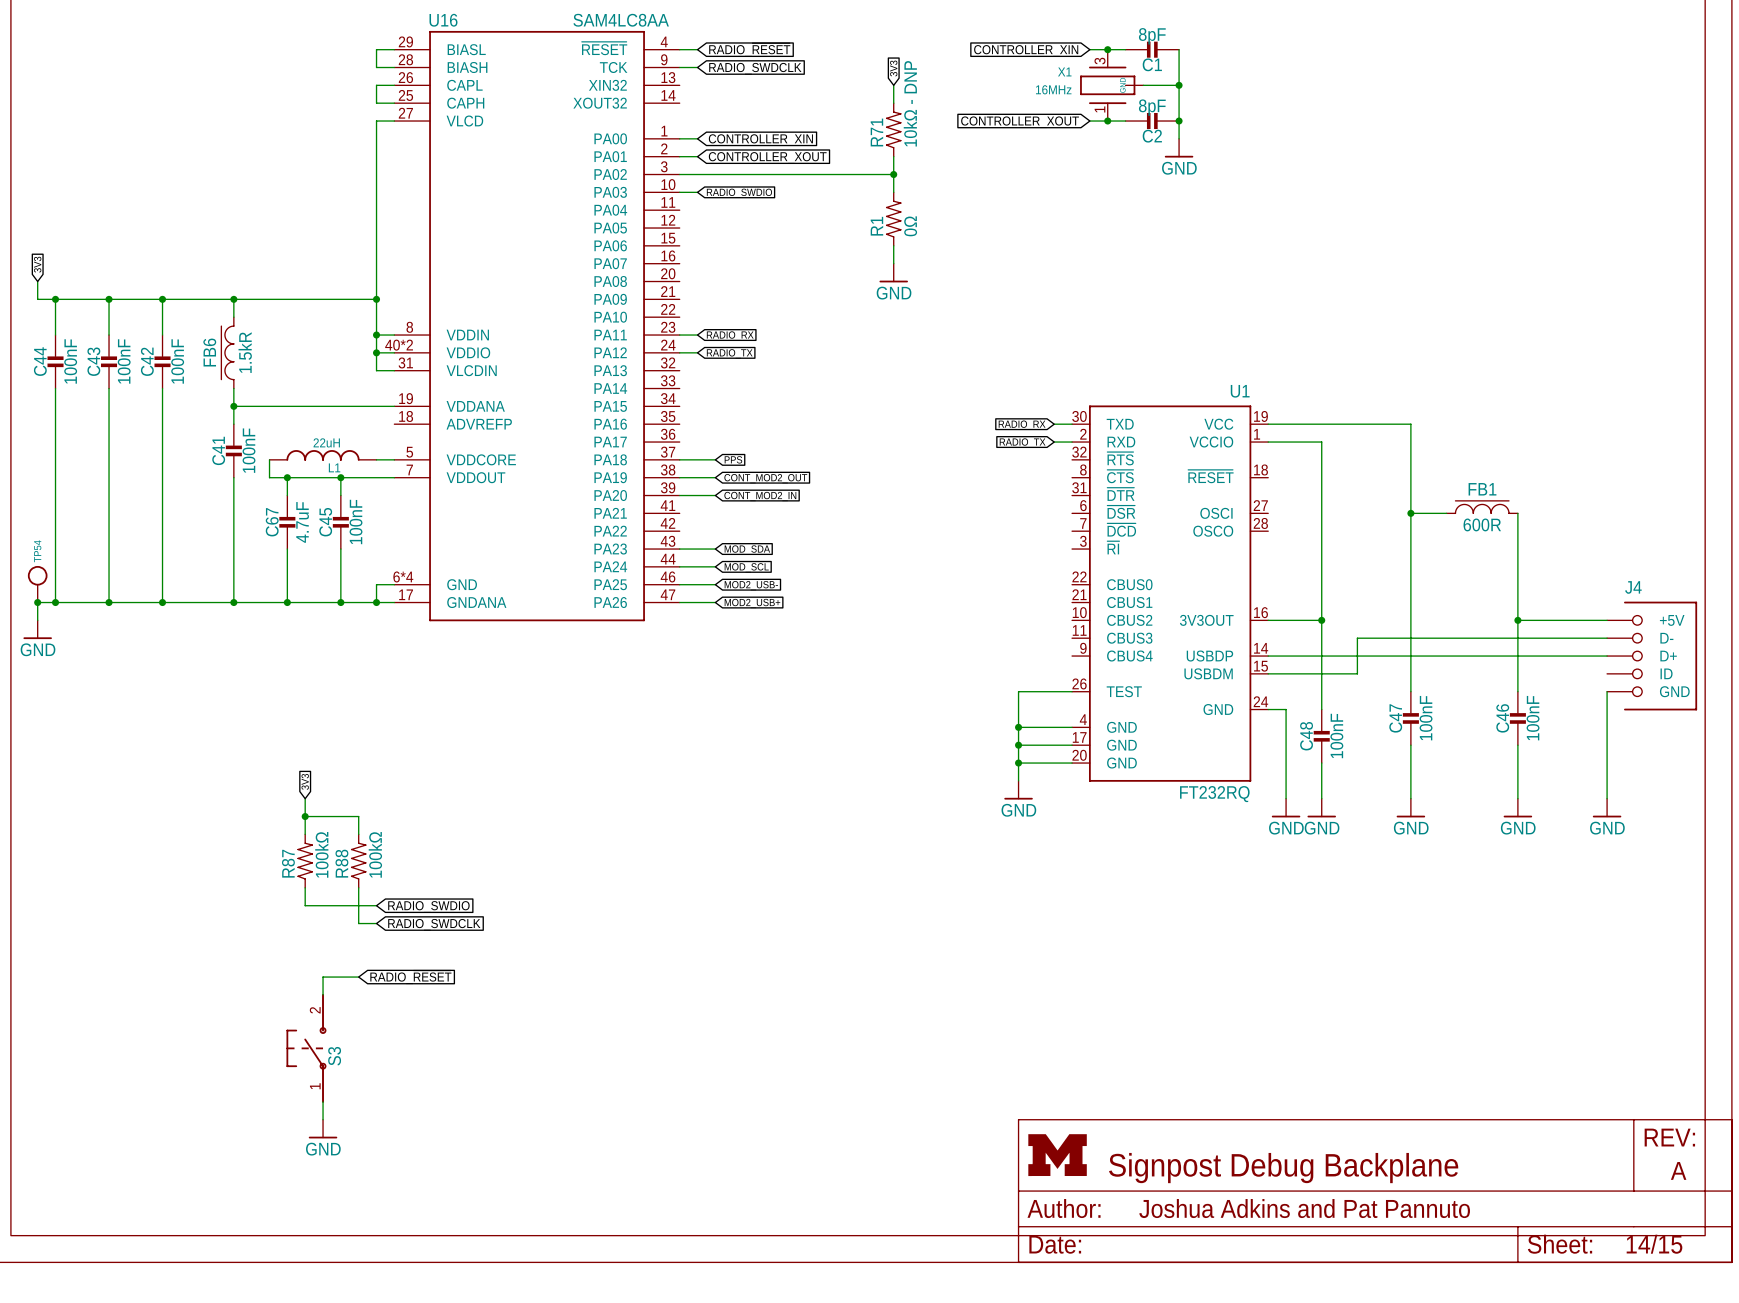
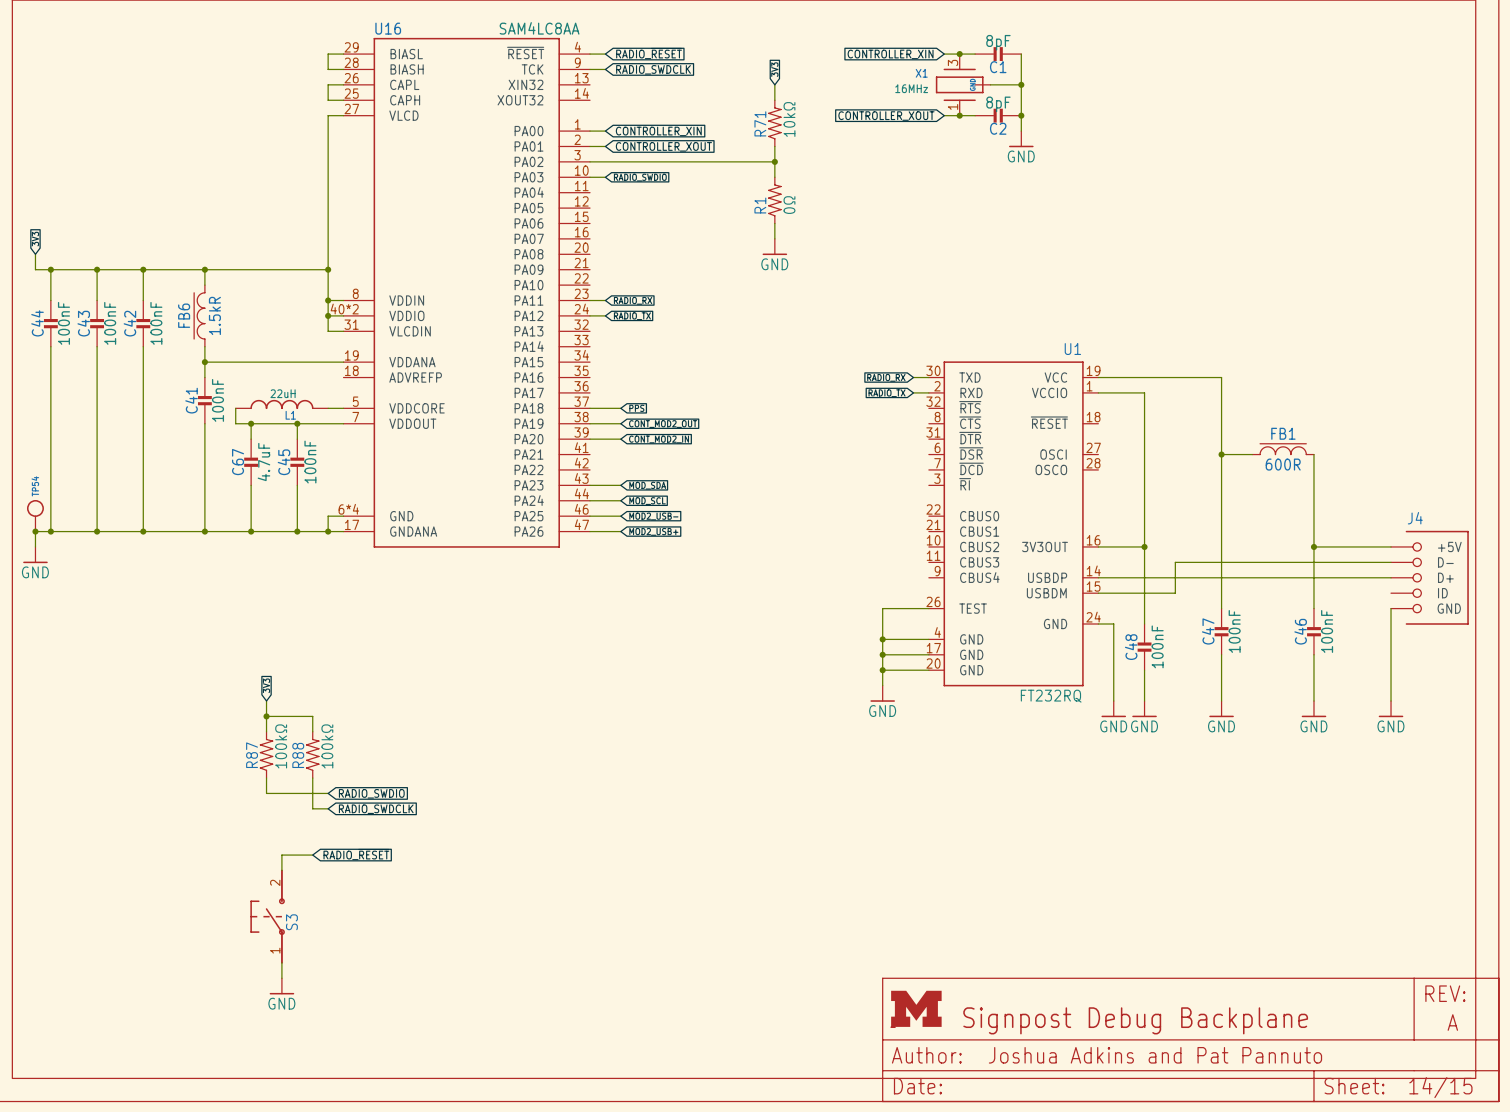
R71 value: 10kΩ - DNP (910, 103) -> 10kΩ (789, 119)

